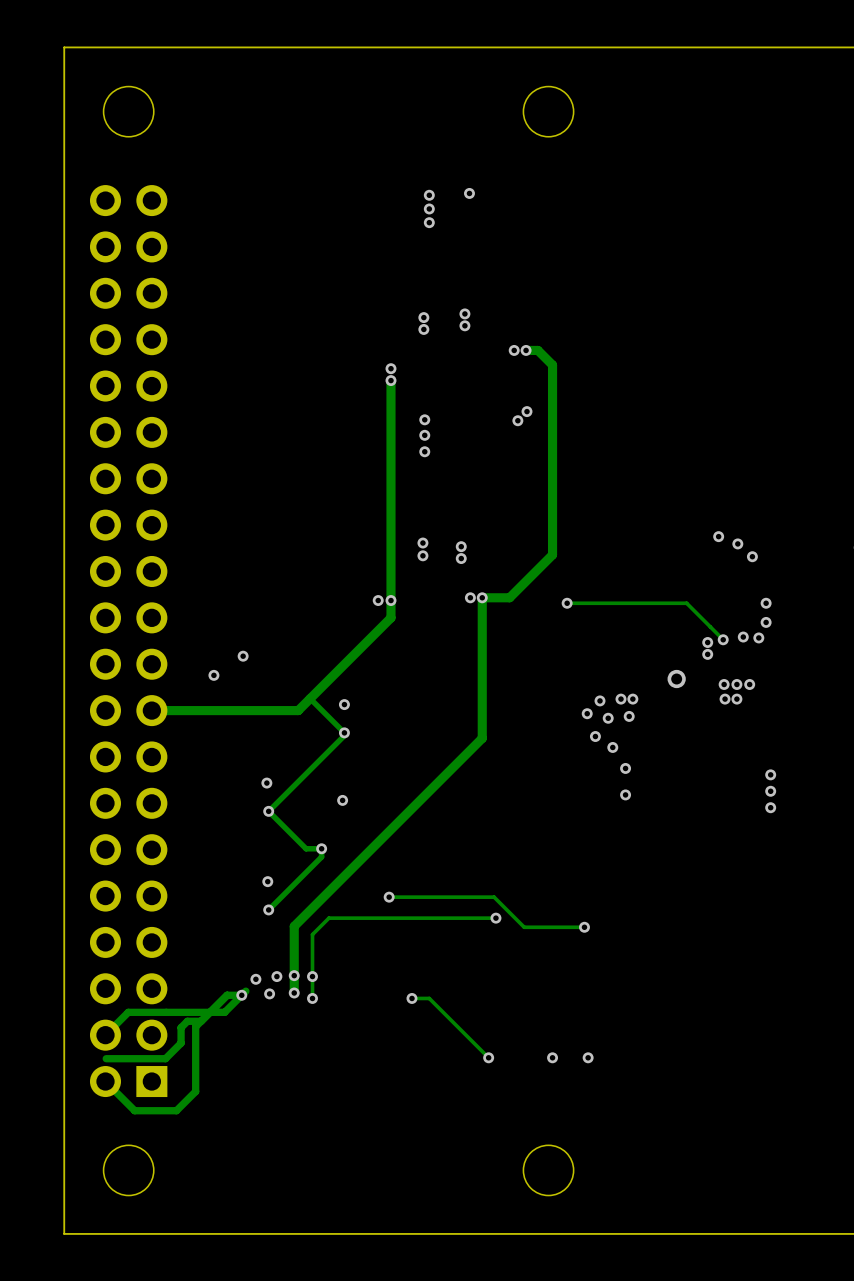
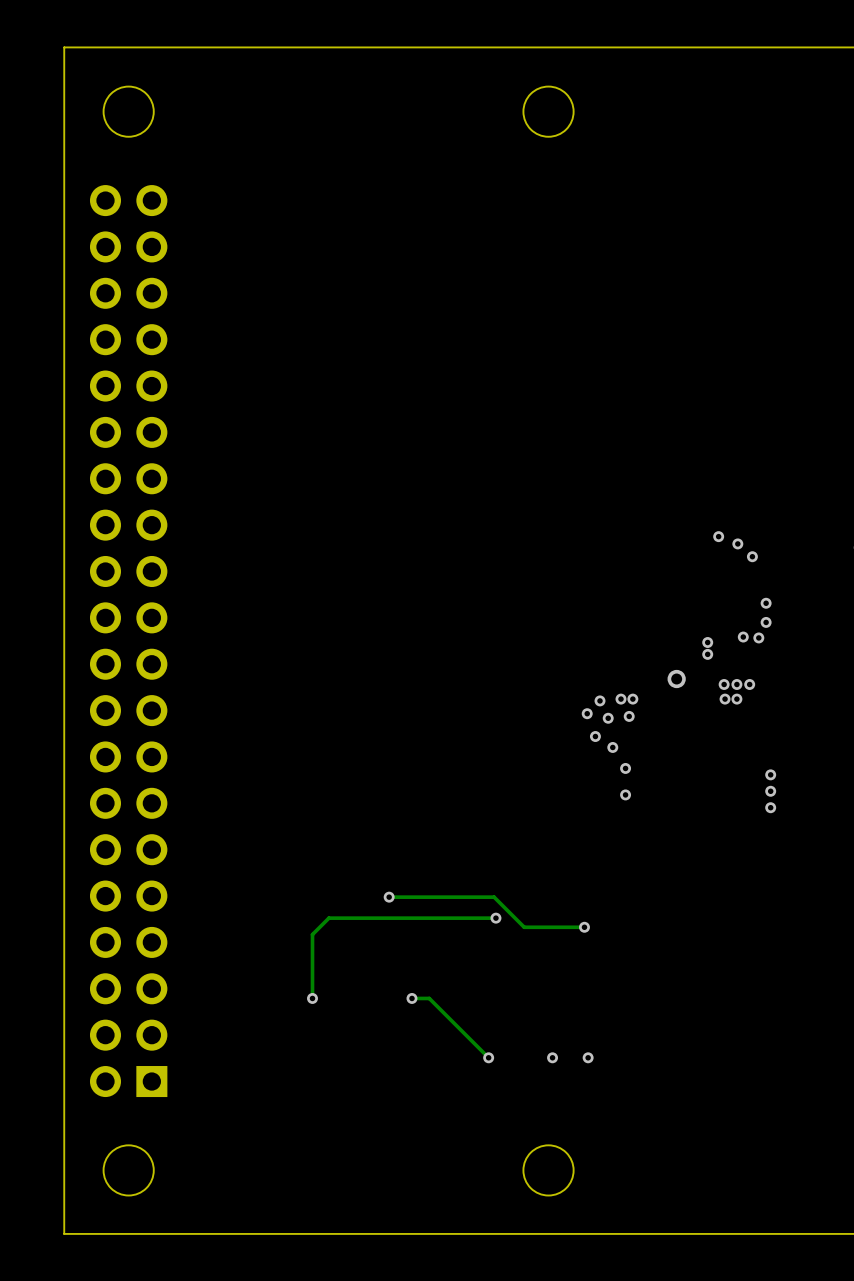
via: (469, 193) -> none
via: (429, 195) -> none
via: (429, 208) -> none
via: (429, 222) -> none
via: (464, 313) -> none
via: (423, 317) -> none
via: (464, 325) -> none
via: (423, 329) -> none
via: (514, 350) -> none
track: (526, 350) (537, 350) (552, 365) (552, 554) (509, 597) (482, 597) (482, 738) (294, 926) (294, 992) -> none
via: (526, 350) -> none
via: (390, 368) -> none
track: (390, 380) (390, 617) (298, 710) (151, 710) -> none
via: (390, 380) -> none
via: (526, 411) -> none
via: (424, 419) -> none
via: (517, 420) -> none
via: (424, 435) -> none
via: (424, 451) -> none
via: (422, 543) -> none
via: (461, 546) -> none
via: (422, 555) -> none
via: (461, 558) -> none
via: (470, 597) -> none
via: (482, 597) -> none
via: (378, 600) -> none
via: (390, 600) -> none
track: (567, 603) (686, 603) (723, 639) -> none
via: (567, 603) -> none
via: (723, 639) -> none
via: (243, 656) -> none
via: (213, 675) -> none
track: (310, 698) (344, 732) (344, 735) (268, 811) (306, 848) (321, 848) (321, 856) (268, 909) -> none
via: (344, 704) -> none
via: (344, 732) -> none
via: (266, 783) -> none
via: (342, 800) -> none
via: (268, 811) -> none
via: (321, 848) -> none
via: (267, 881) -> none
via: (268, 909) -> none
via: (294, 975) -> none
via: (276, 976) -> none
via: (312, 976) -> none
via: (255, 979) -> none
track: (245, 991) (224, 1012) (128, 1012) (105, 1035) -> none
via: (294, 992) -> none
via: (269, 993) -> none
track: (241, 995) (227, 995) (195, 1026) (195, 1091) (176, 1110) (134, 1110) (105, 1081) -> none
via: (241, 995) -> none
track: (201, 1021) (187, 1021) (181, 1027) (181, 1043) (165, 1058) (106, 1058) -> none

